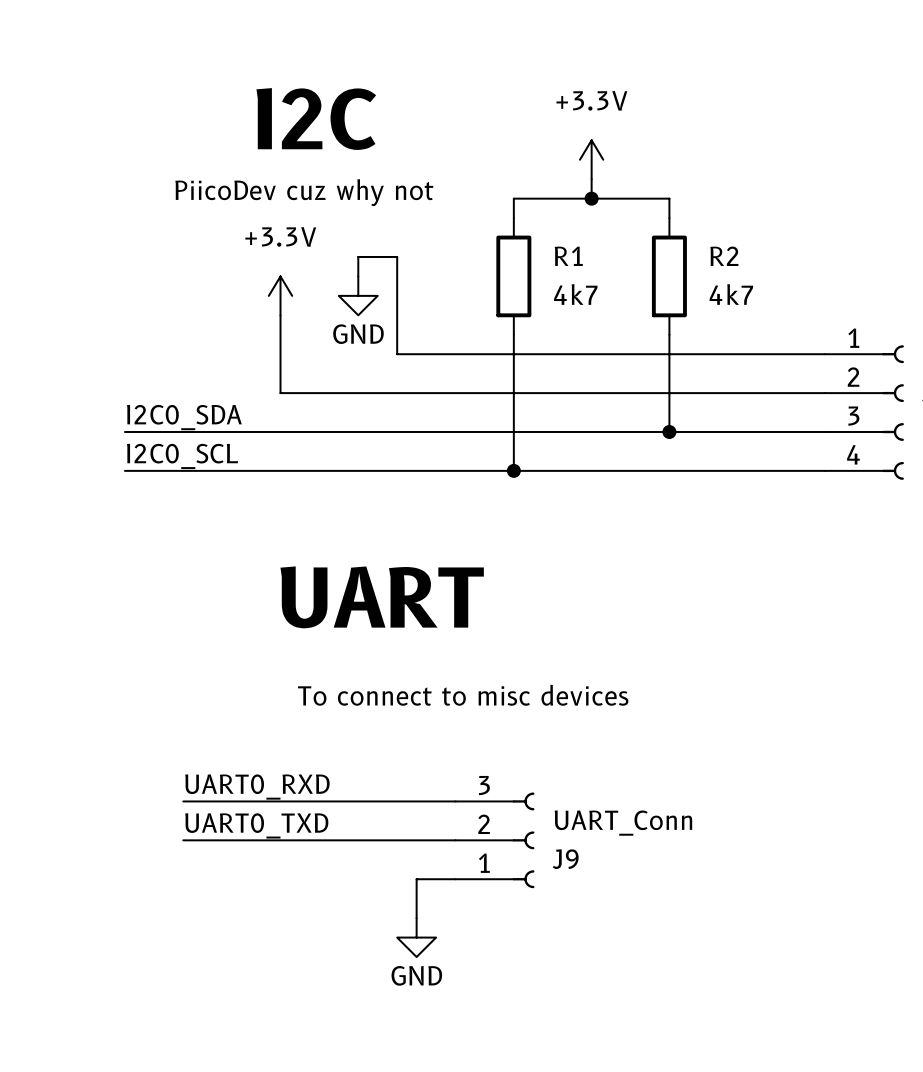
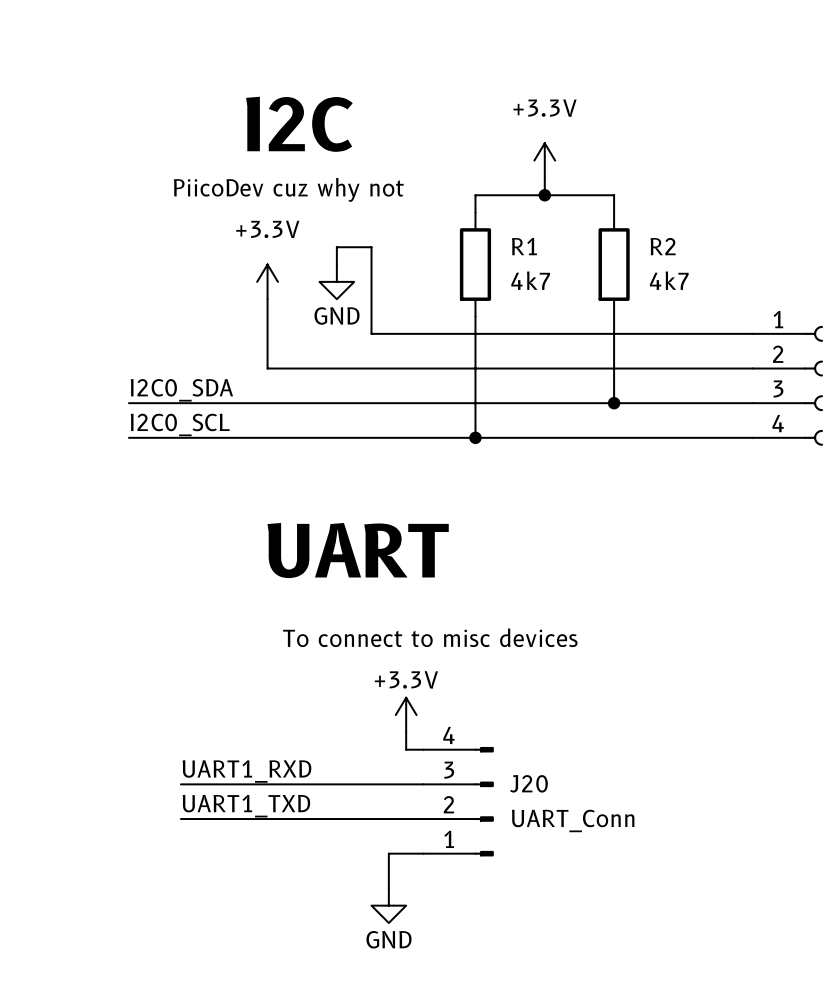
power symbol: none -> +3.3V (406, 715)
label: UART0_RXD (257, 787) -> none
wire: (183, 801) (455, 801) -> (180, 784) (423, 784)
wire: none -> (406, 732) (406, 749) (423, 749)
label: UART0_TXD (256, 825) -> UART1_RXD (246, 771)
wire: (183, 840) (455, 840) -> (180, 819) (423, 819)
J9: UART_Conn (494, 840) -> none
wire: (455, 879) (416, 879) (416, 918) -> (423, 853) (388, 853) (388, 888)
J20: none -> UART_Conn (458, 801)
label: none -> UART1_TXD (246, 806)
power symbol position: GND (416, 937) -> GND (388, 905)

